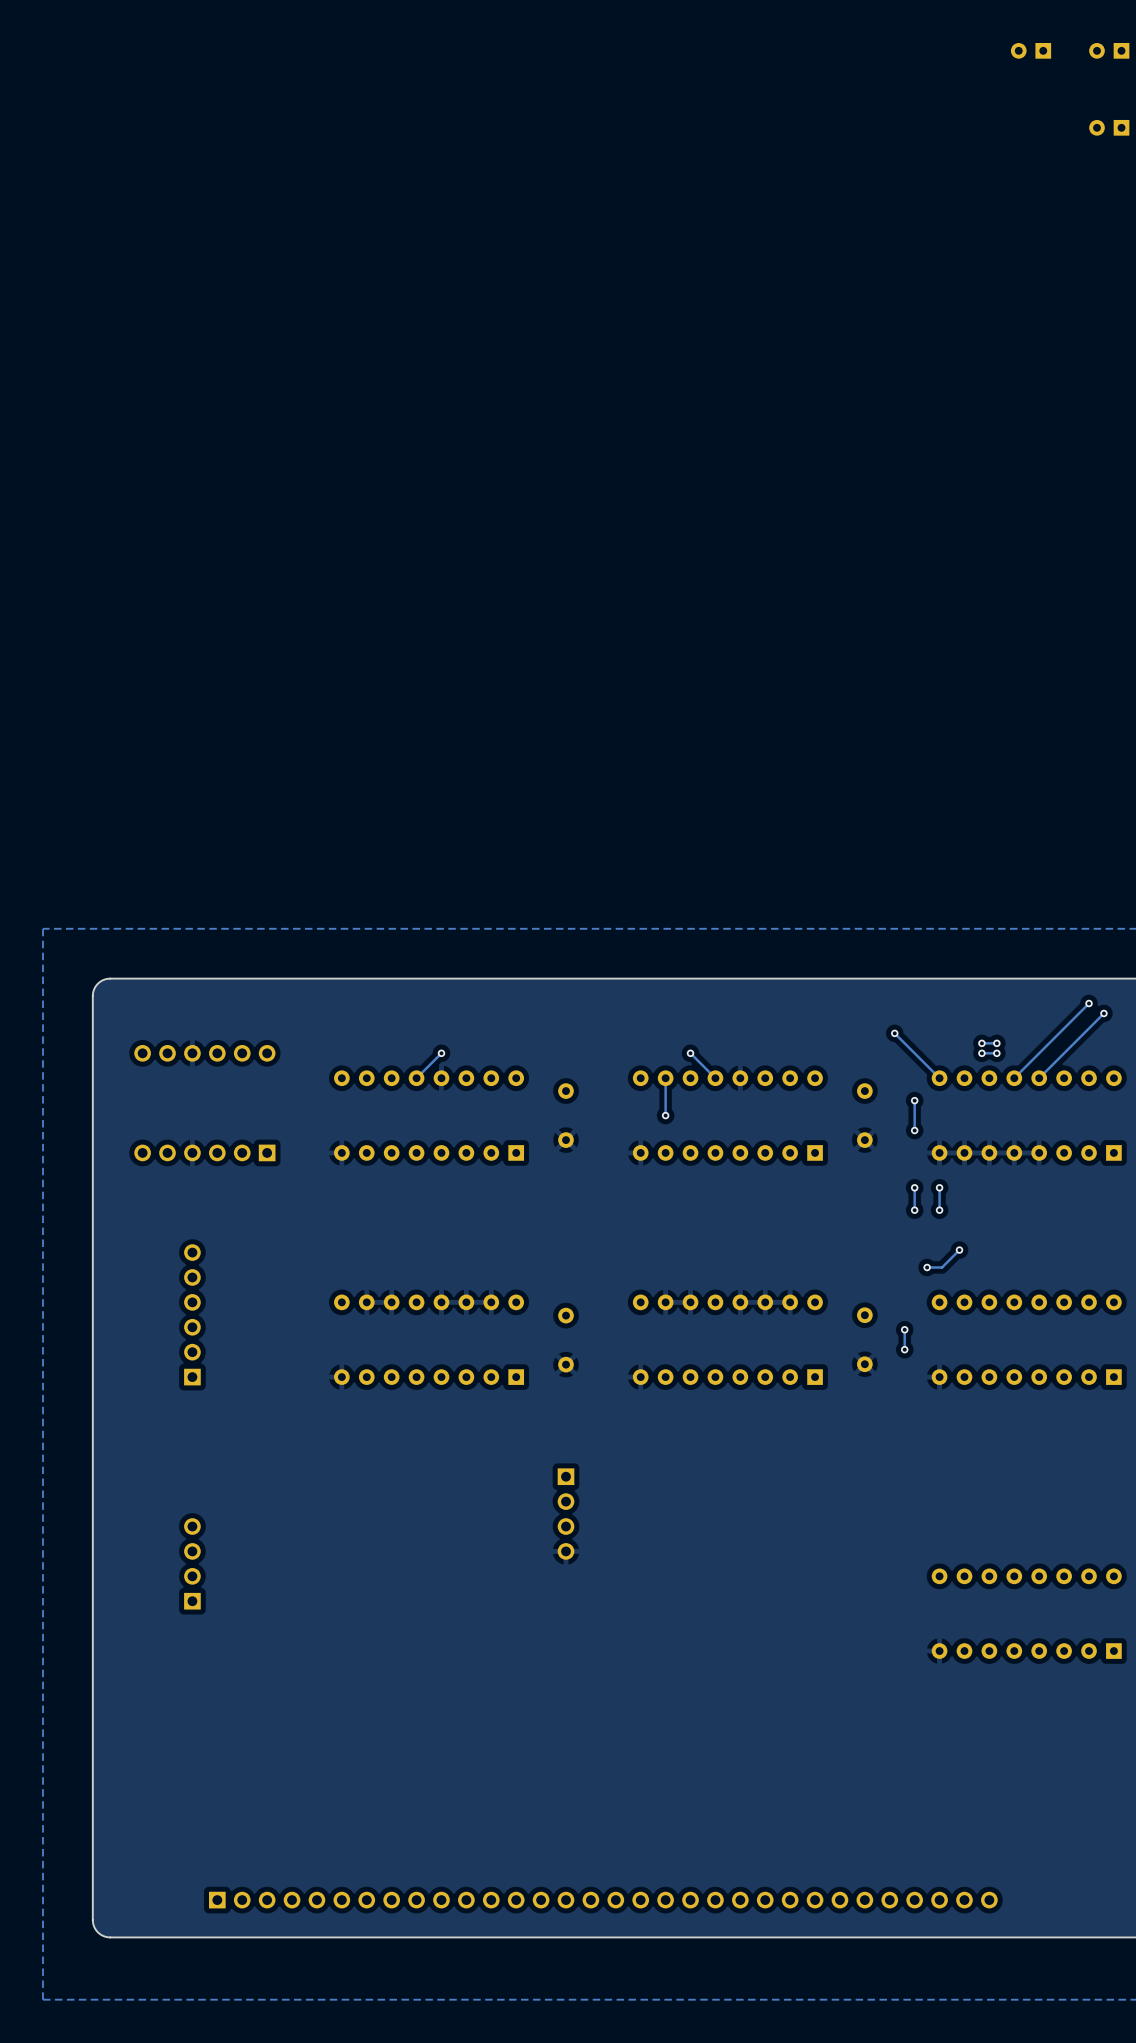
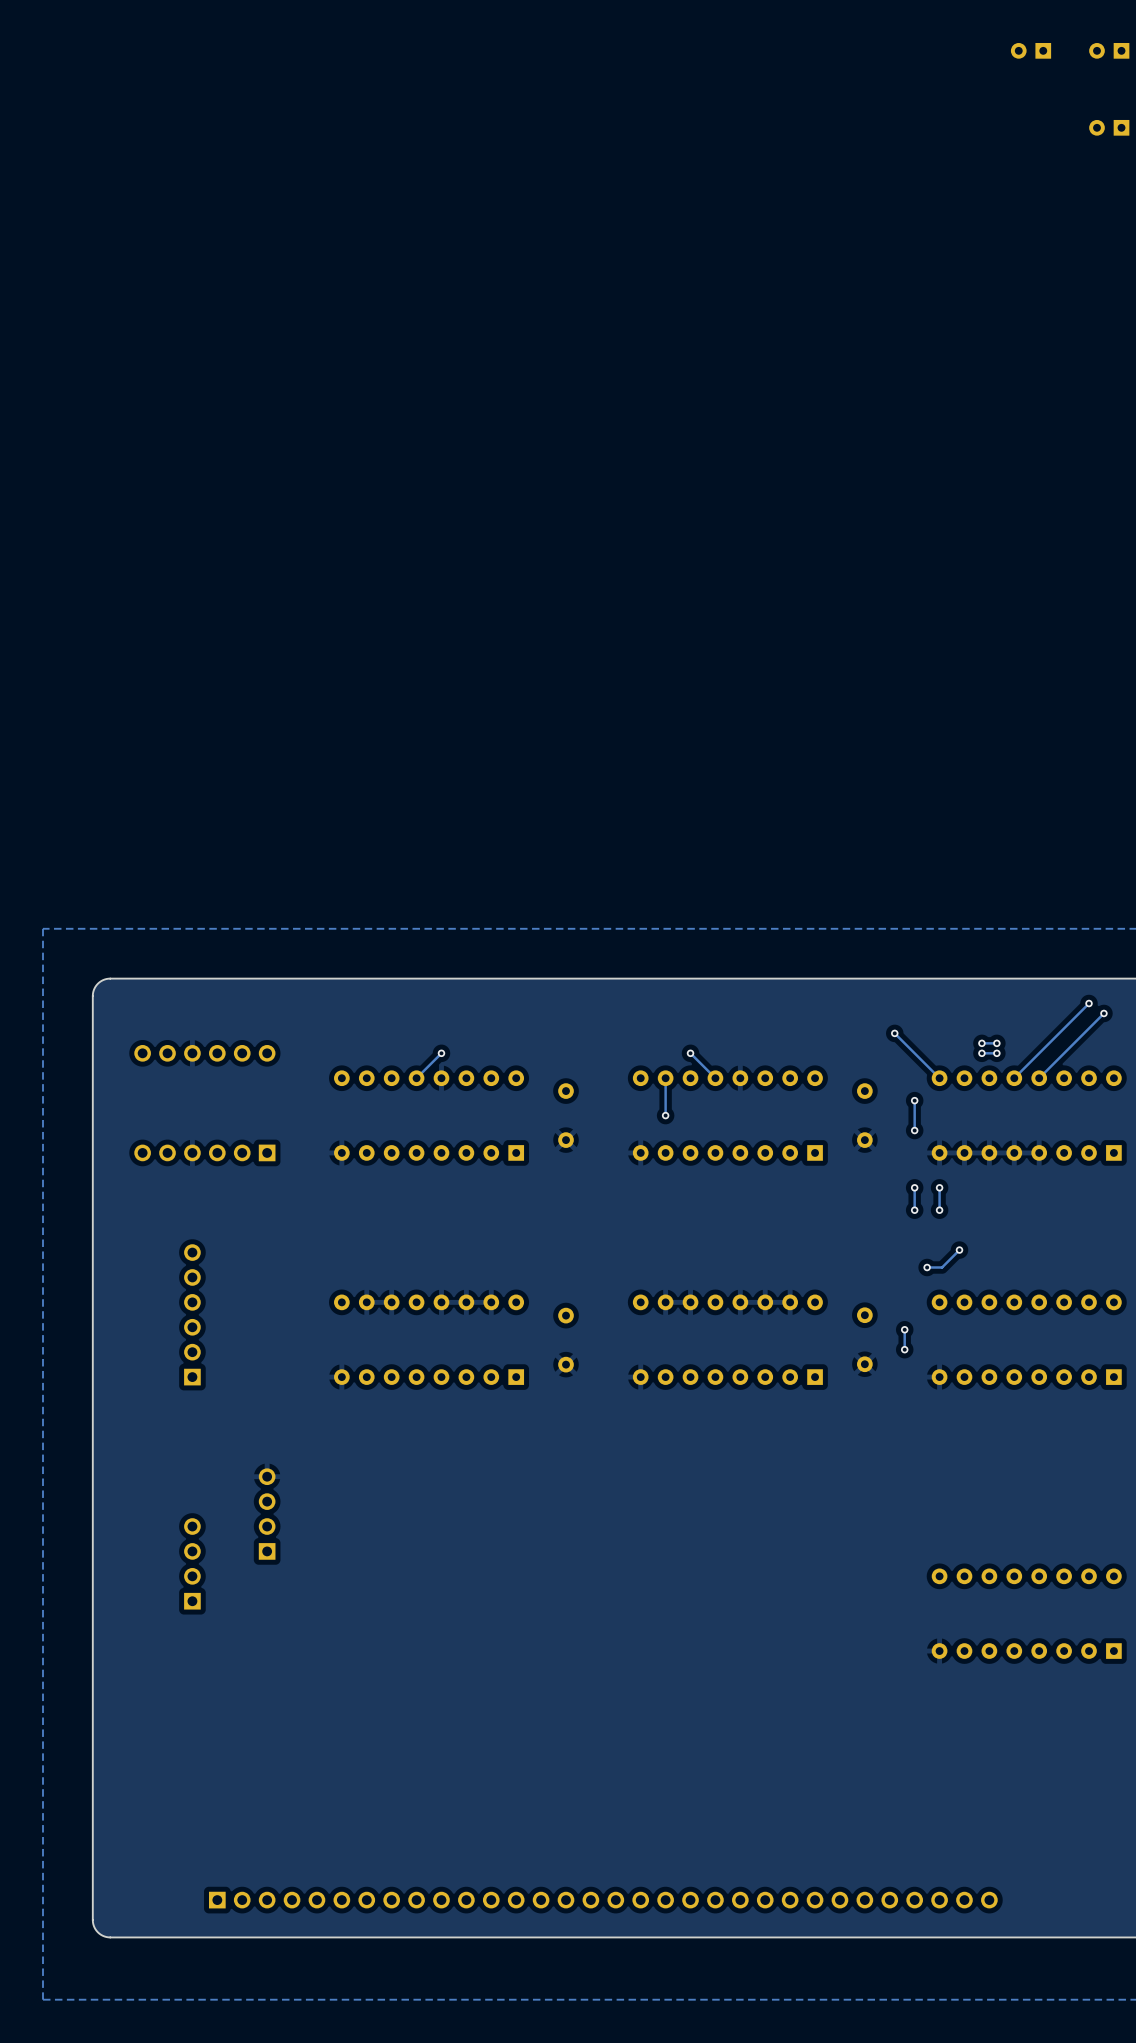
part: none -> (267, 1514)
part: (566, 1514) -> none

